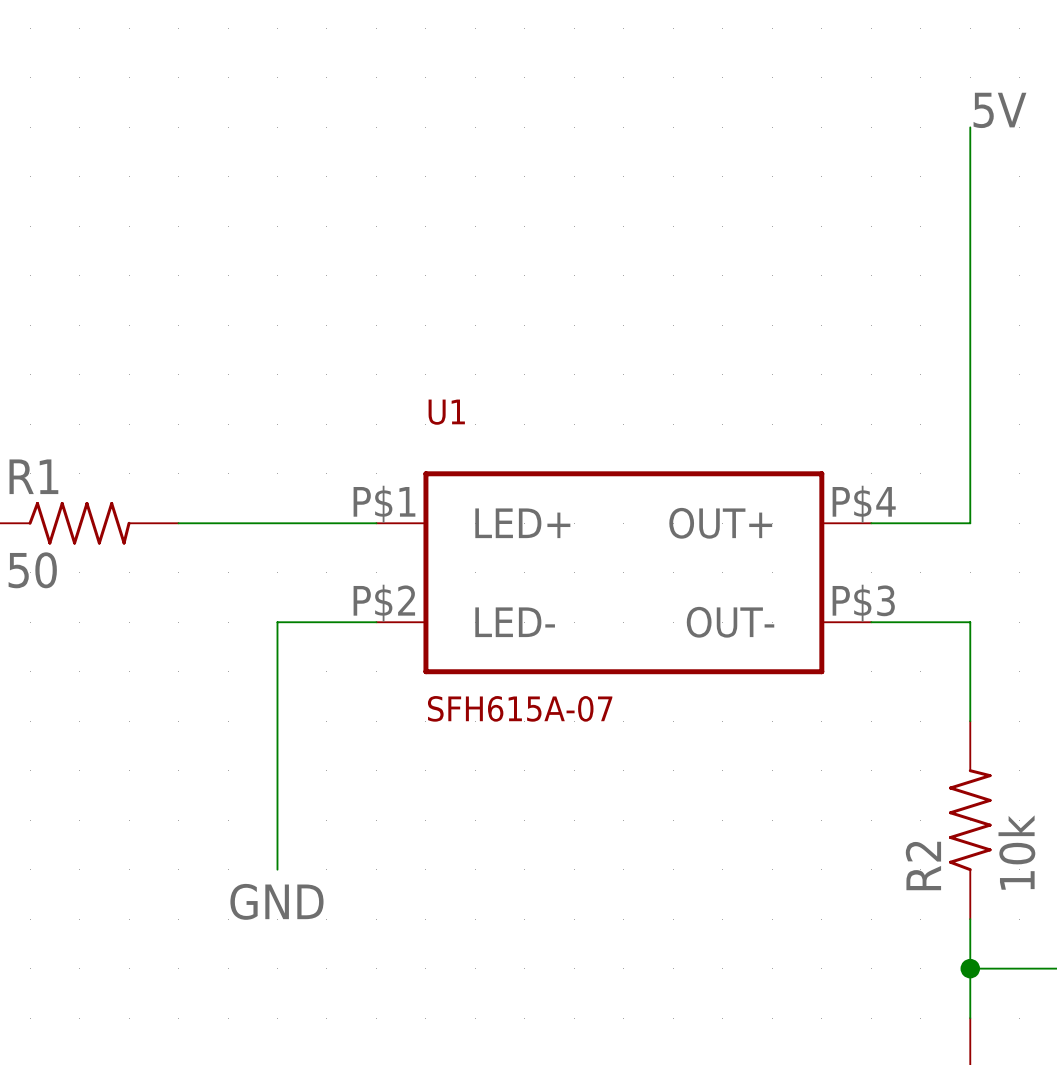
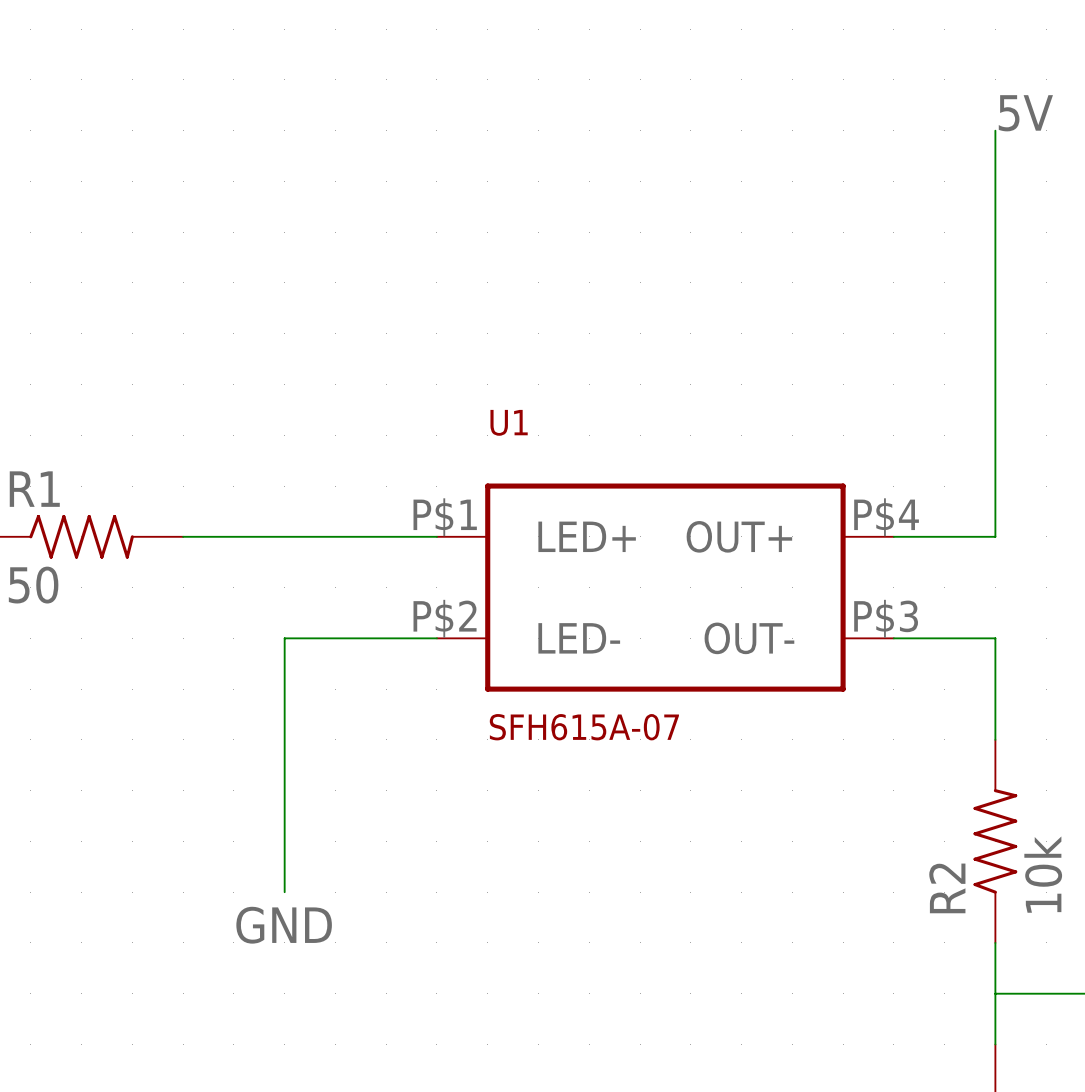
U1 symbol: [376, 471, 872, 675] -> [436, 483, 894, 692]
junction: (970, 968) -> none

